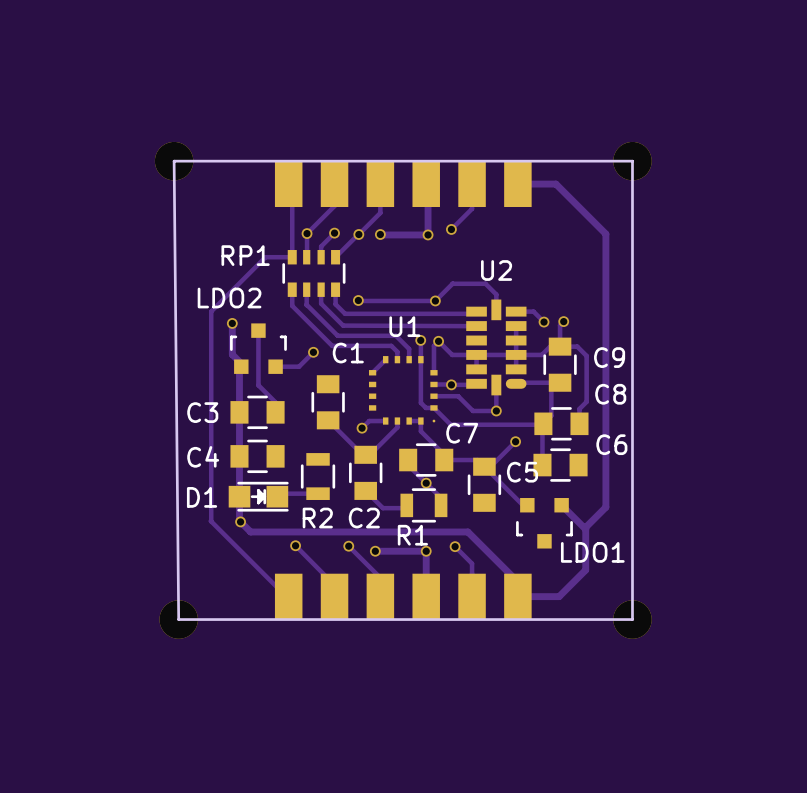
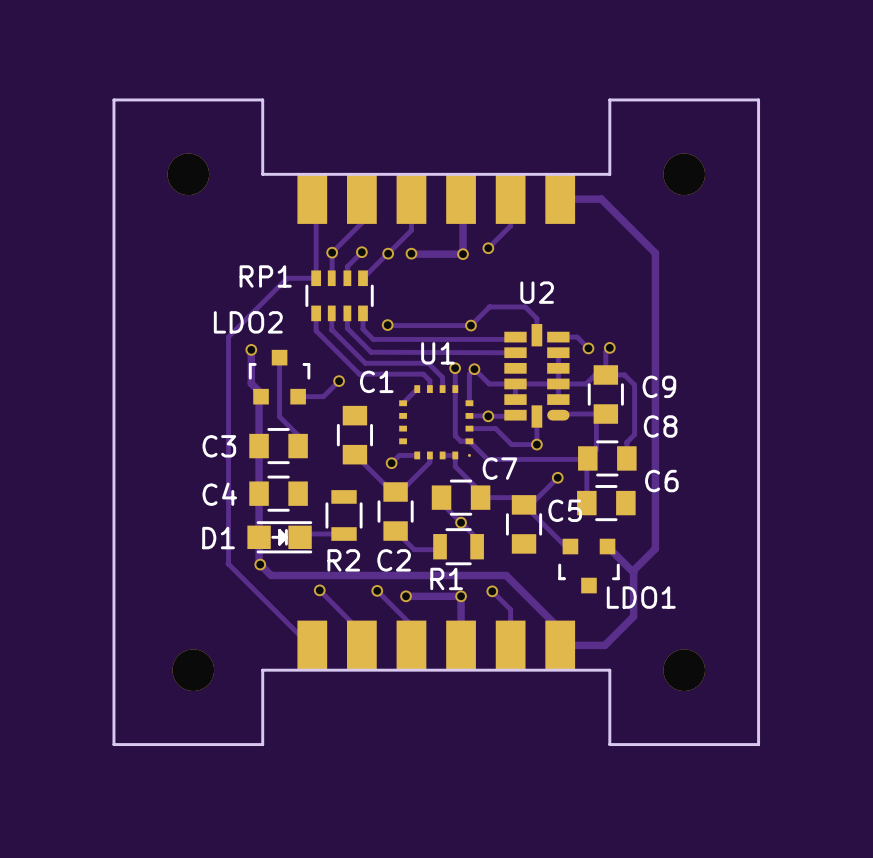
board edge: (242, 161) (174, 161) (178, 619) (242, 619) -> (262, 174) (262, 99) (113, 99) (113, 744) (262, 744) (262, 670)
board edge: (563, 161) (632, 161) (632, 619) (563, 619) -> (609, 174) (609, 99) (758, 99) (758, 744) (609, 744) (609, 670)

